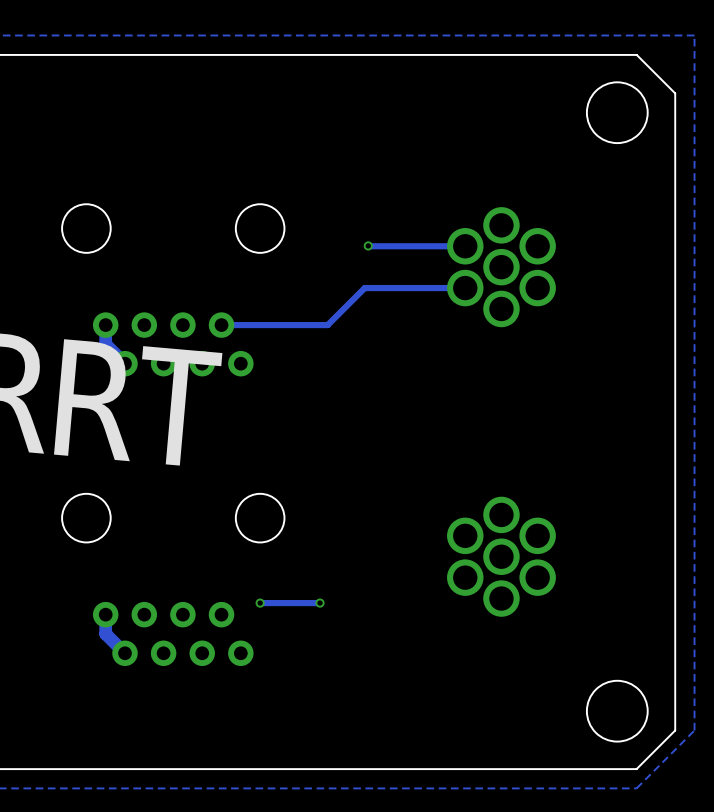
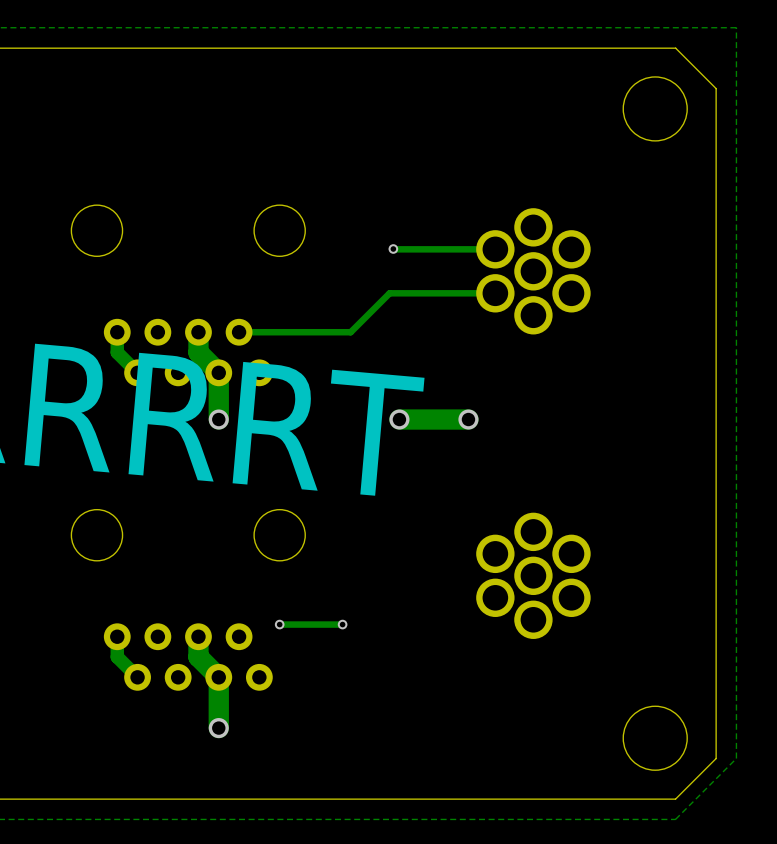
track: none -> (198, 332) (198, 352) (218, 372) (218, 419)
via: none -> (218, 419)
via: none -> (399, 419)
track: none -> (468, 419) (399, 419)
via: none -> (468, 419)
track: none -> (198, 636) (198, 657) (218, 677) (218, 728)
via: none -> (218, 728)

